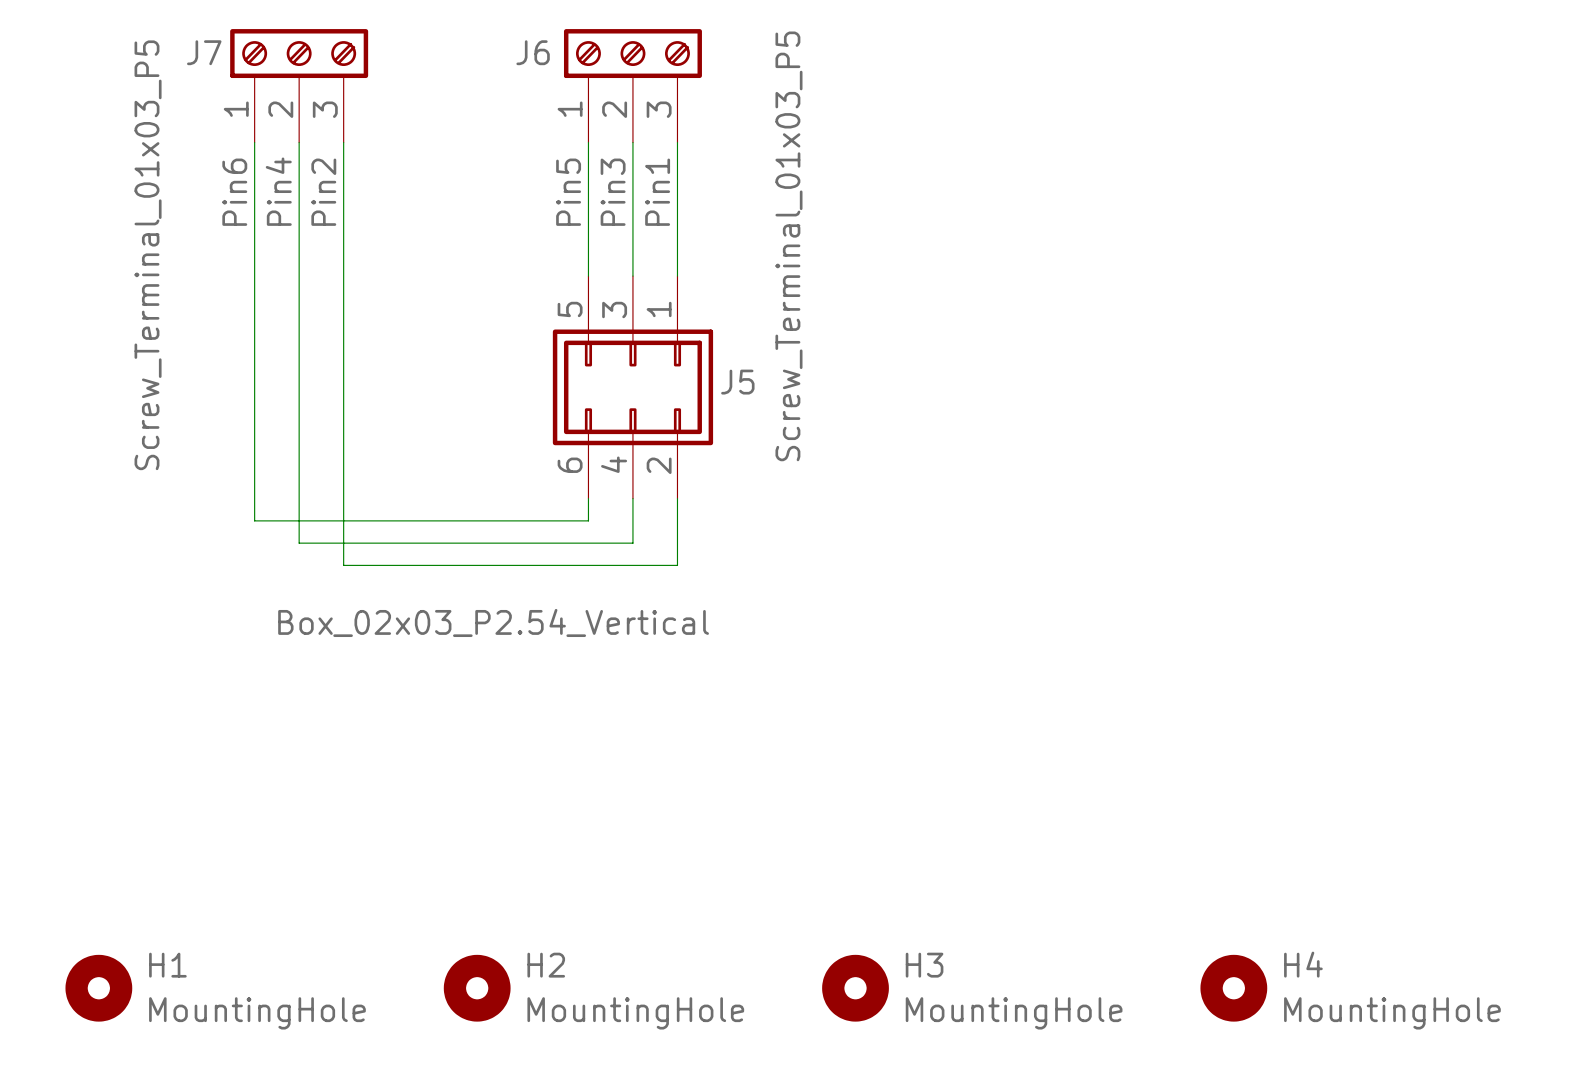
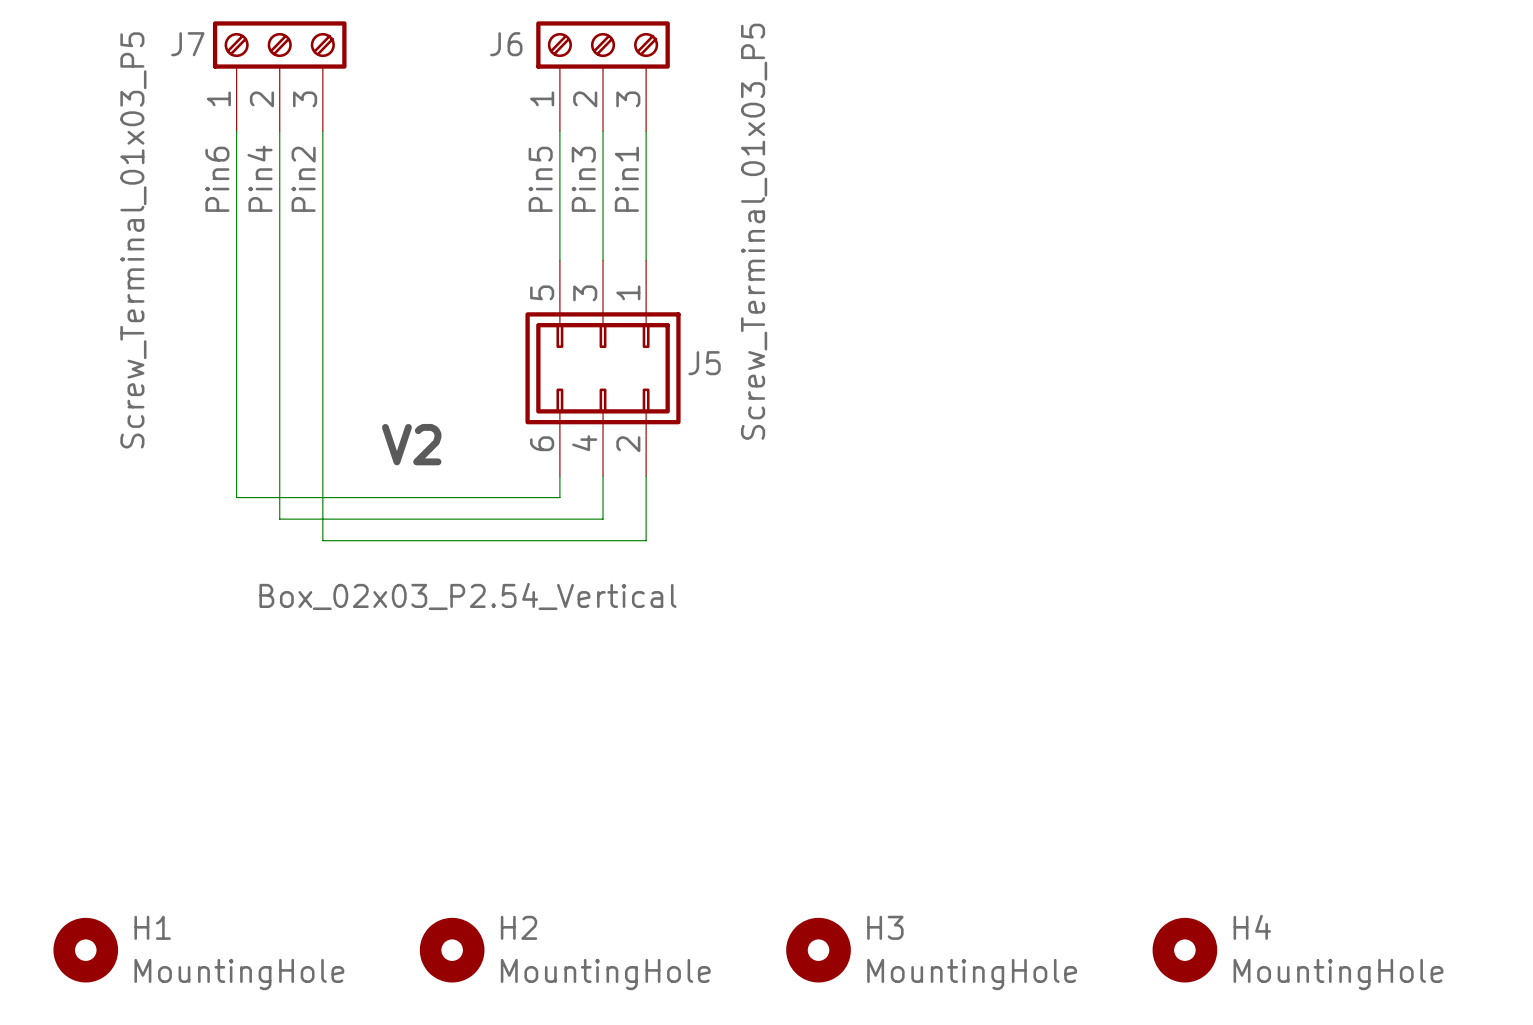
text: none -> V2 (411, 444)

